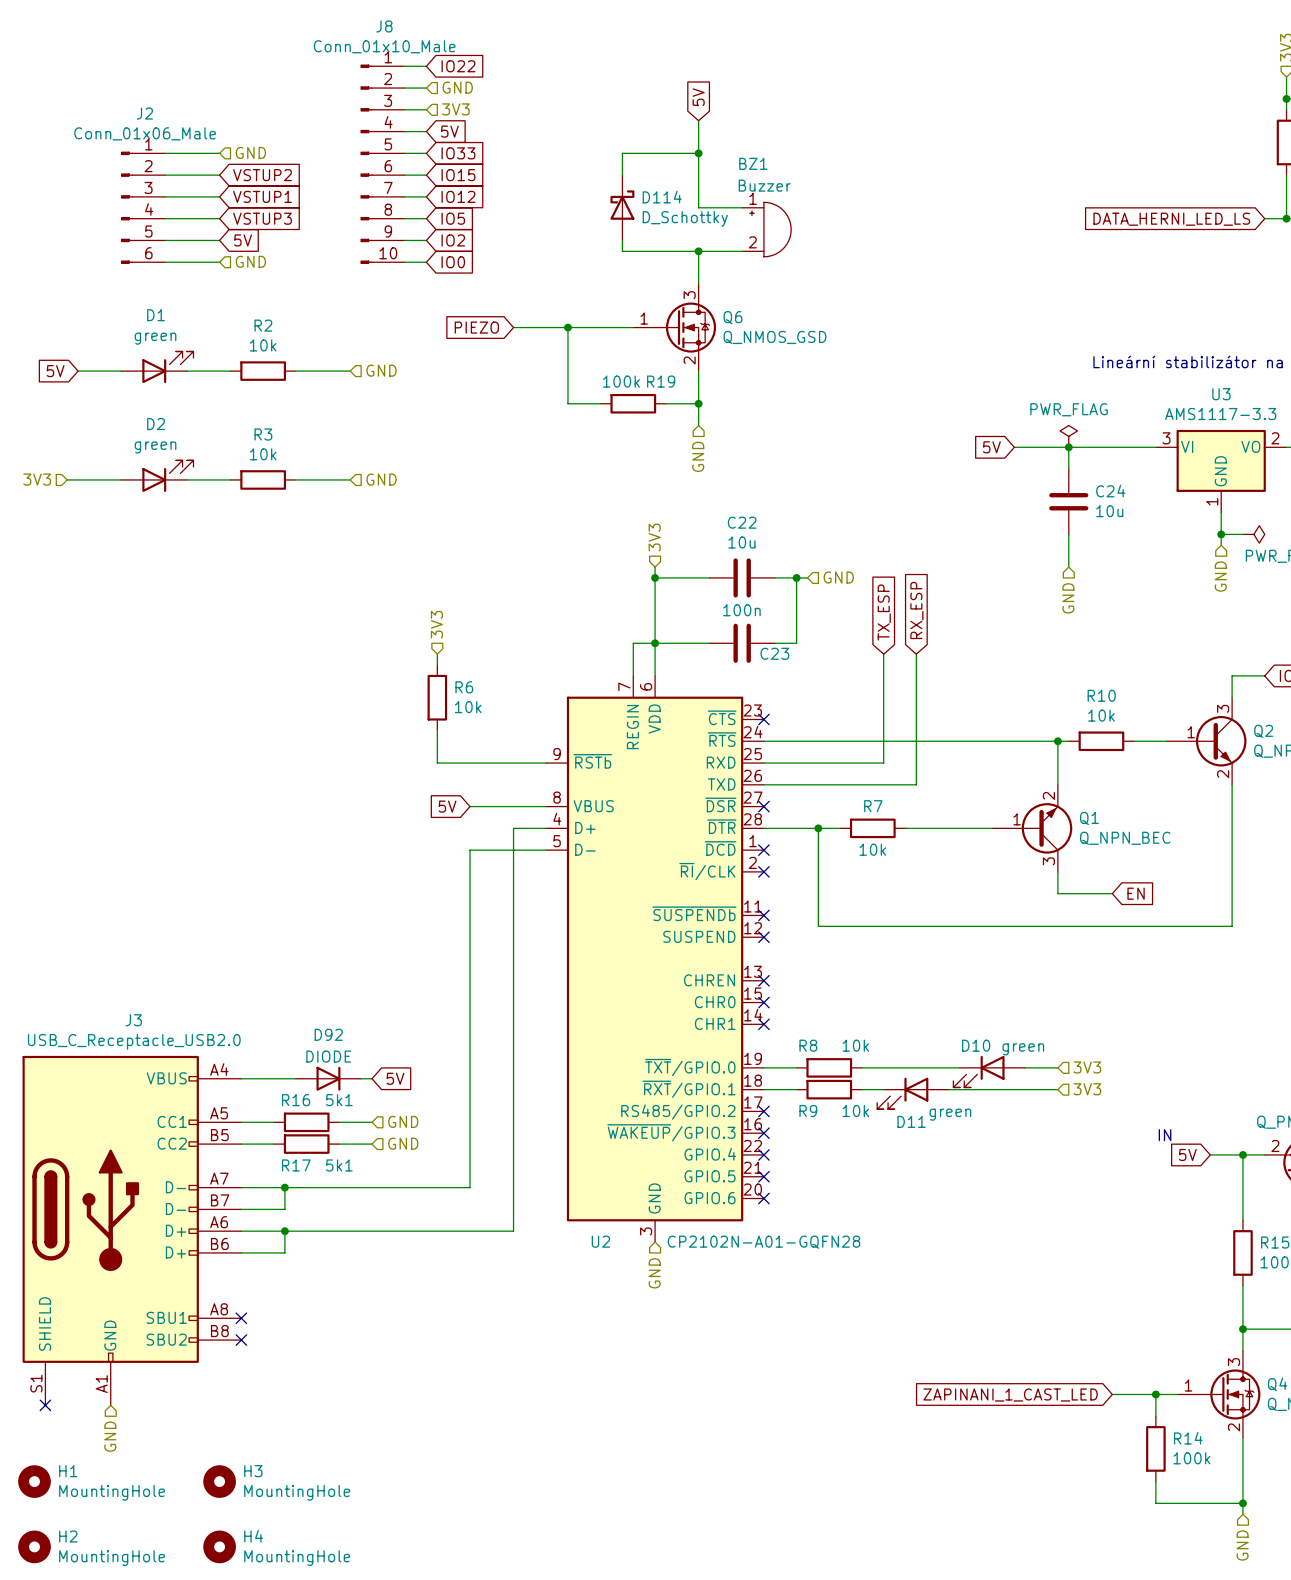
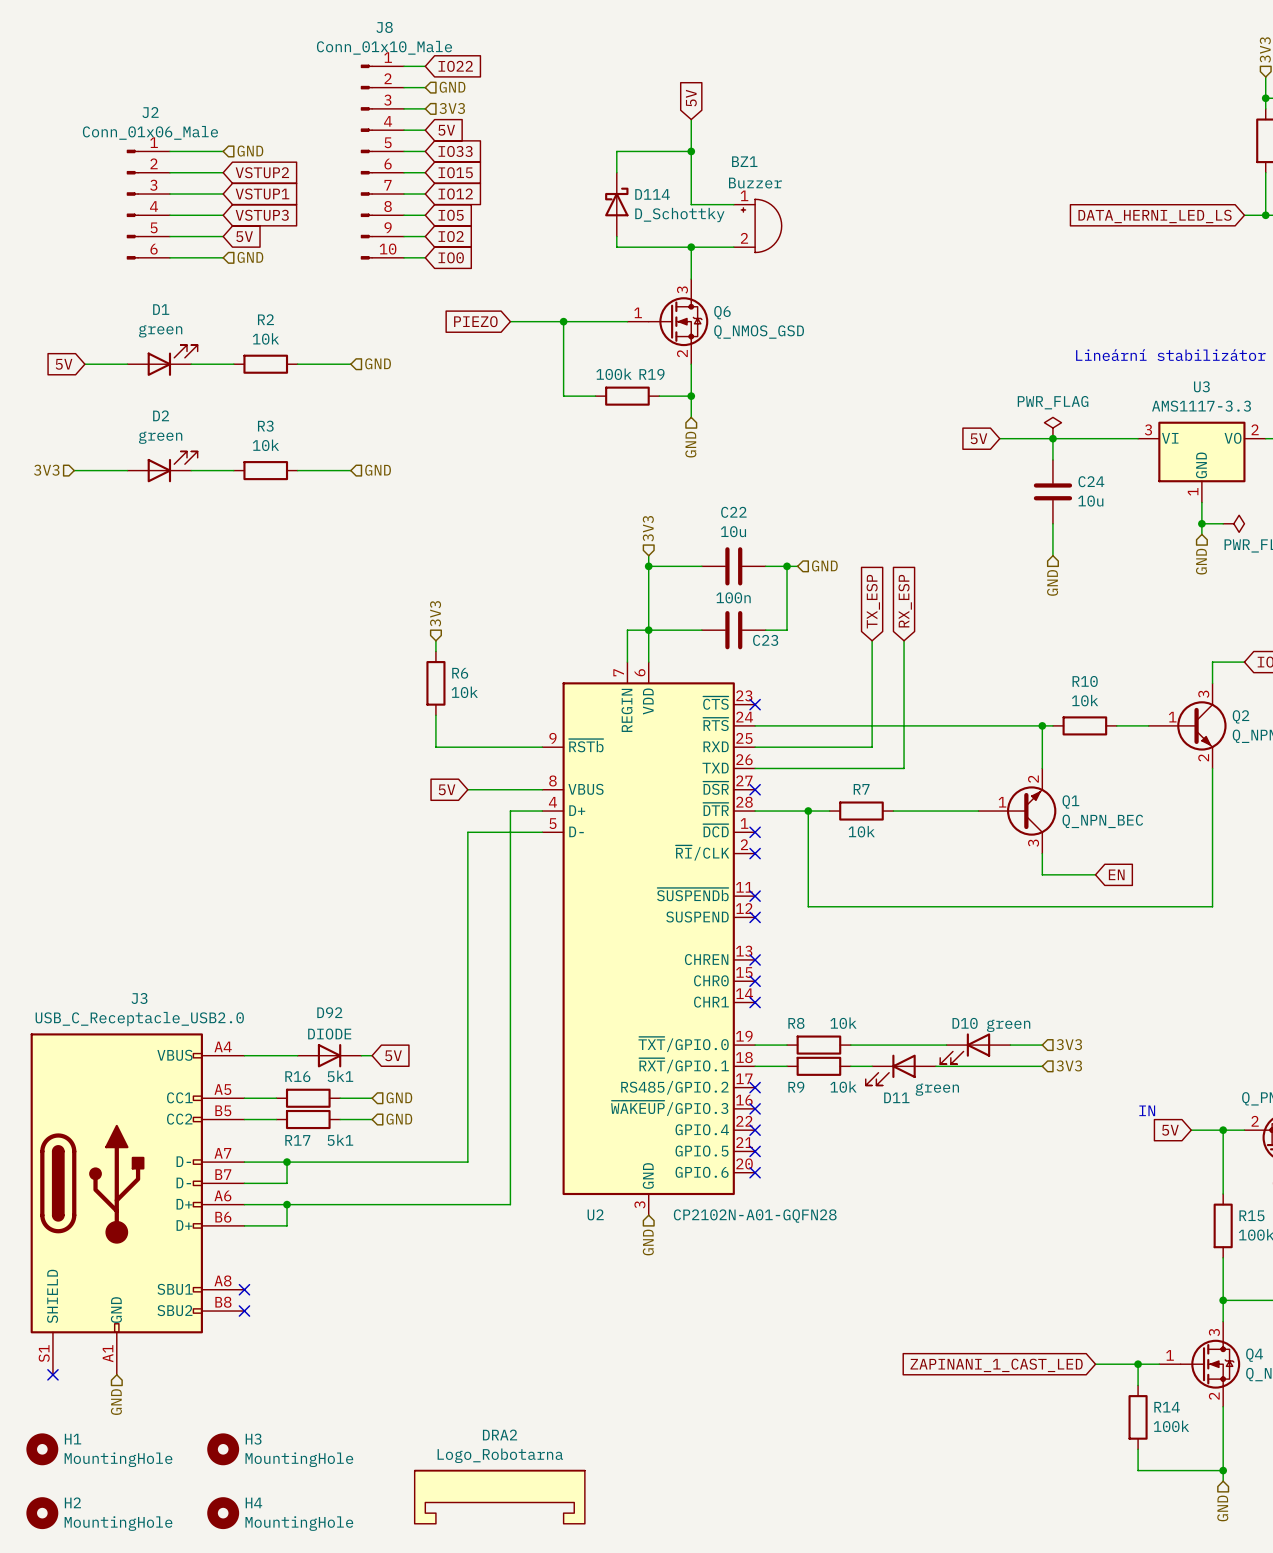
DRA2: none -> Logo_Robotarna (499, 1497)

